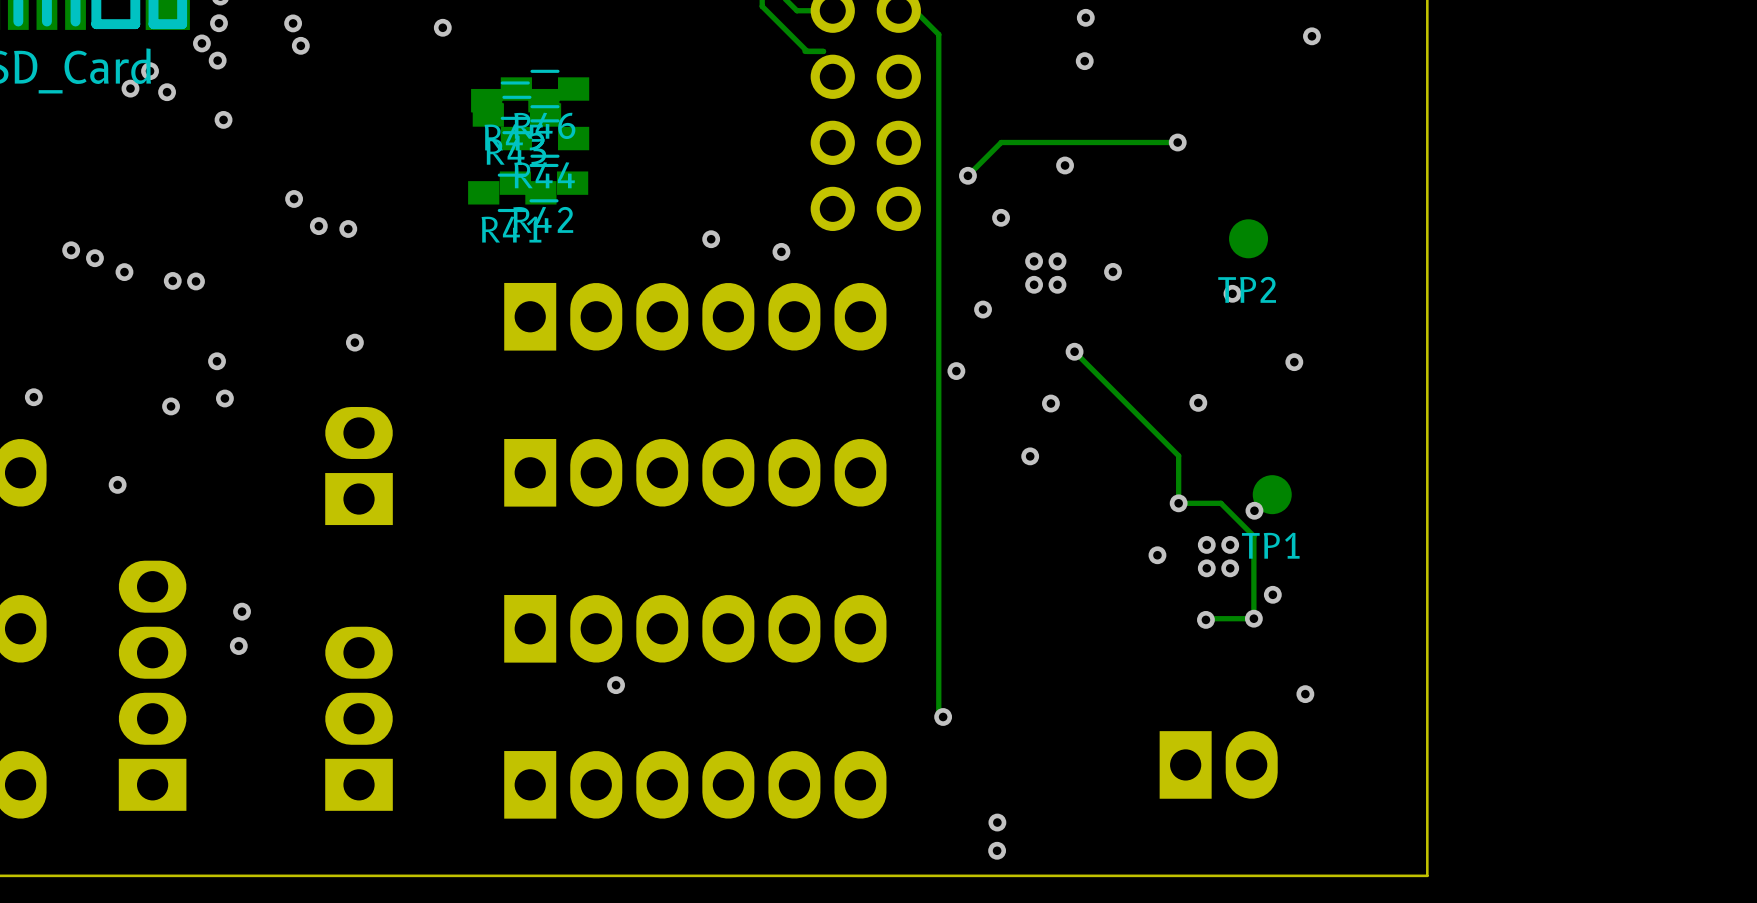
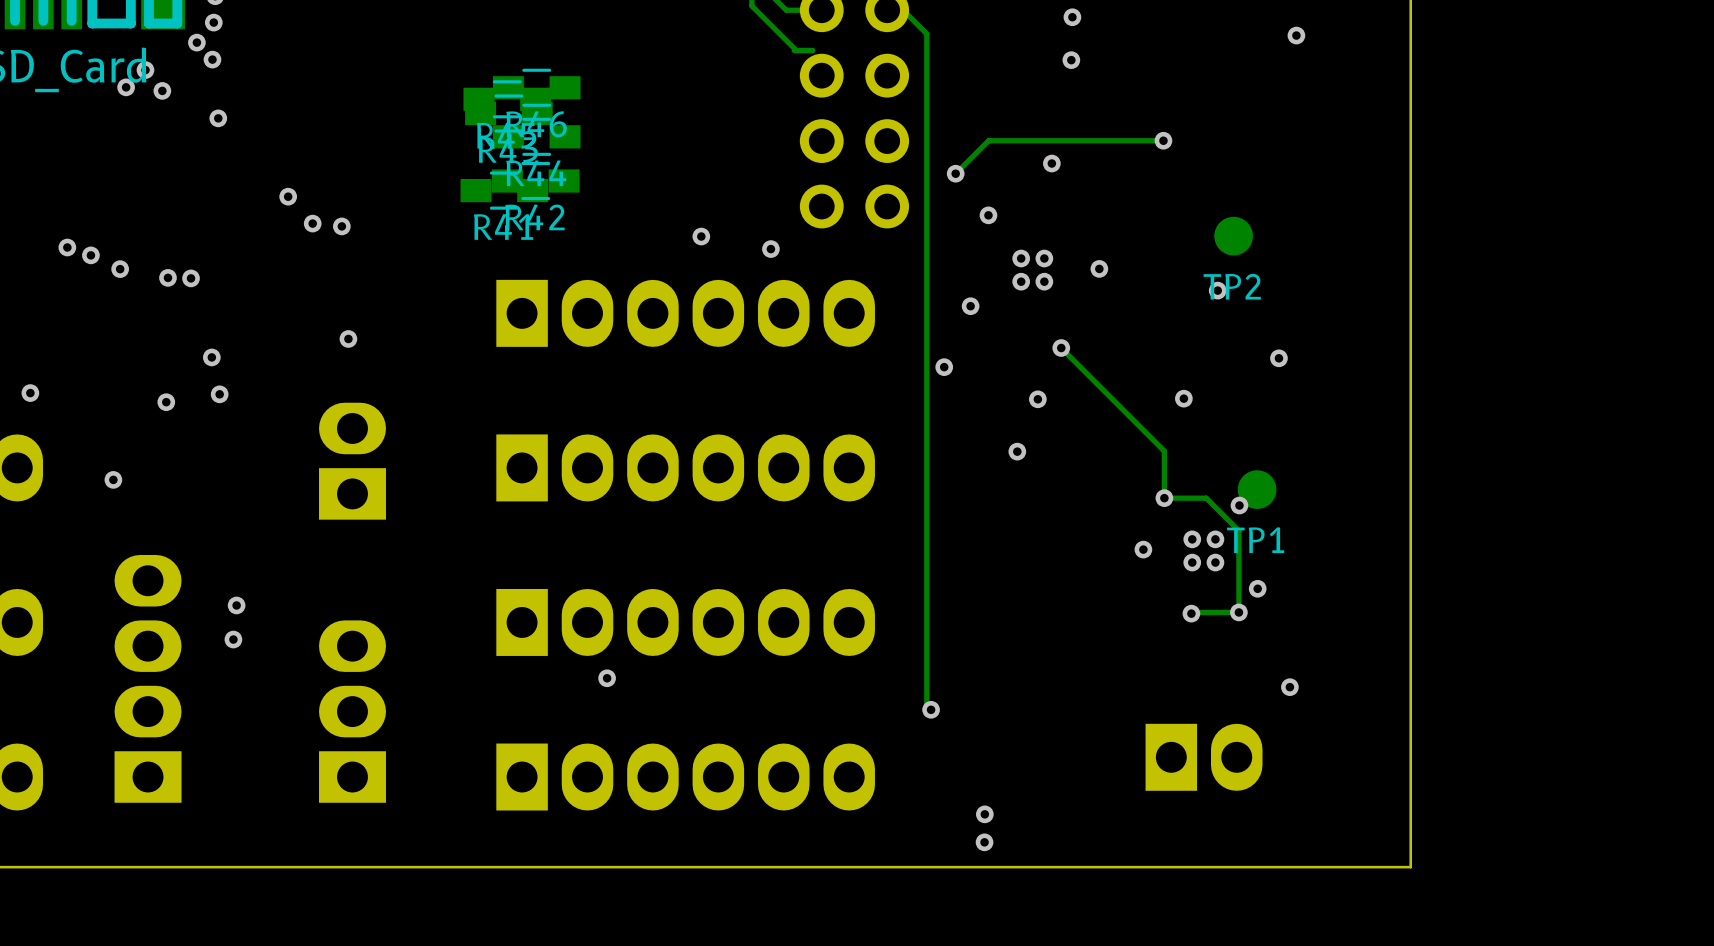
via: (293, 23) -> none
via: (442, 27) -> none
via: (300, 45) -> none

